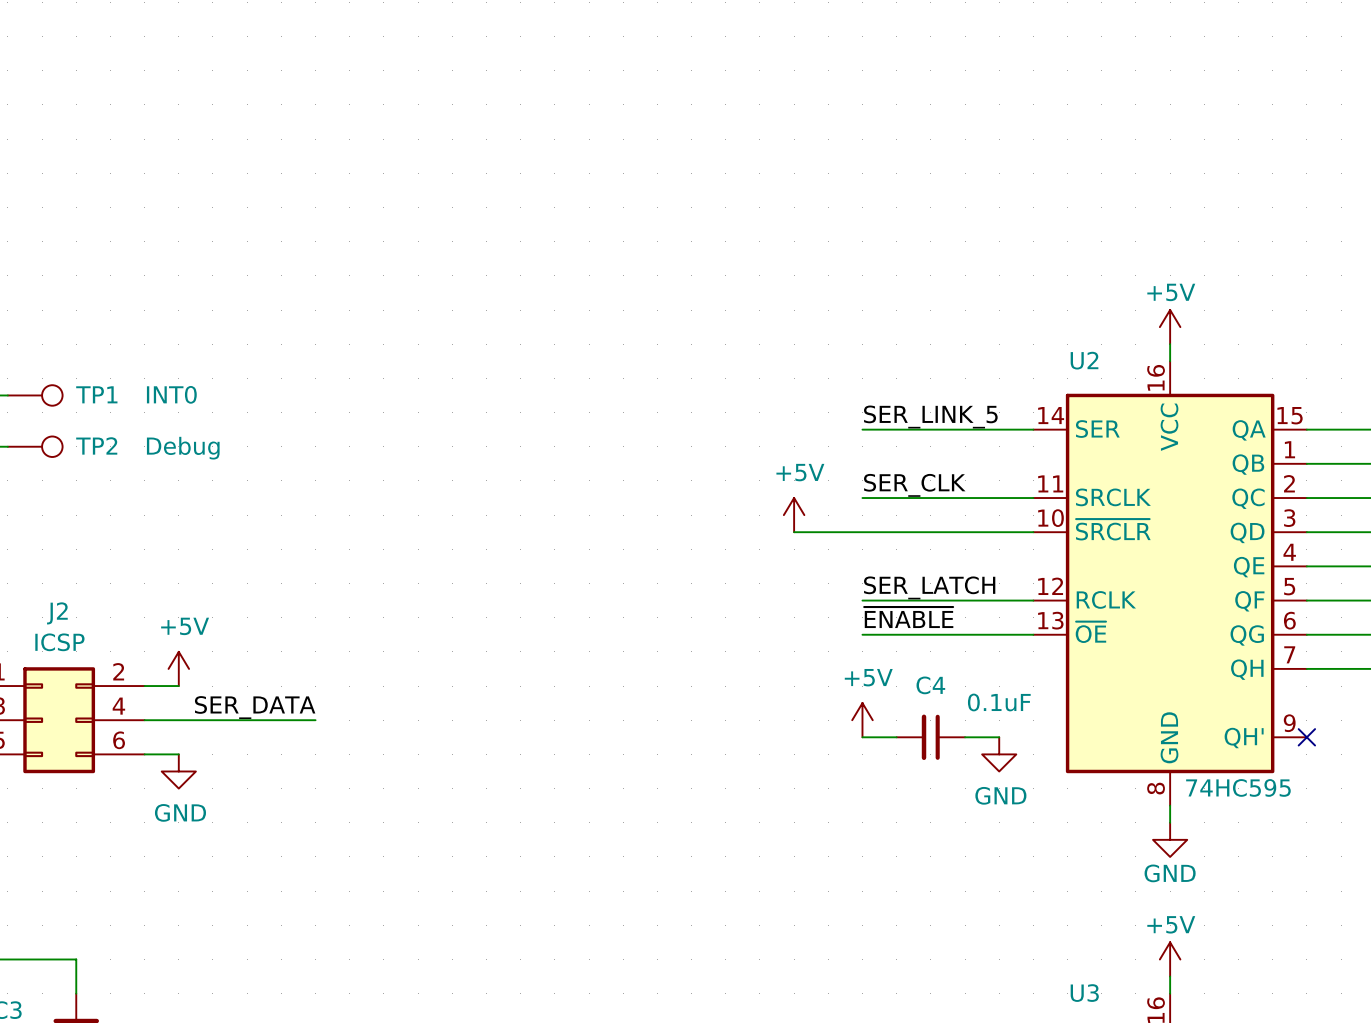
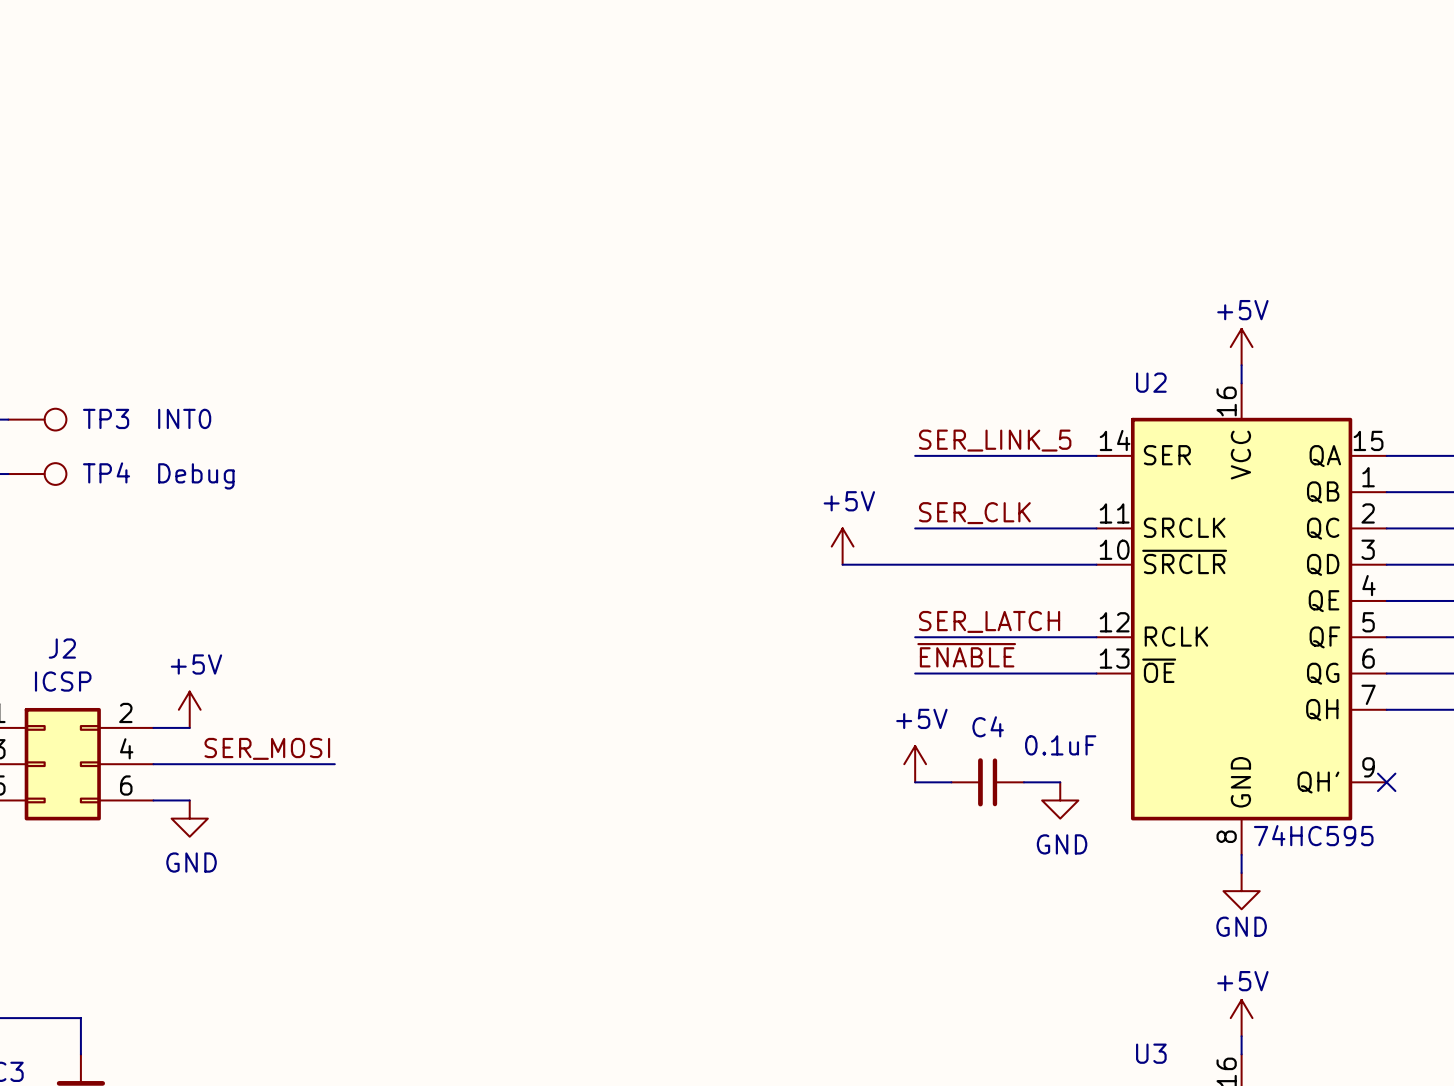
TP1 name: TP1 (96, 394) -> TP3 (106, 418)
TP2 name: TP2 (96, 445) -> TP4 (106, 472)
label: SER_DATA (255, 707) -> SER_MOSI (267, 748)

